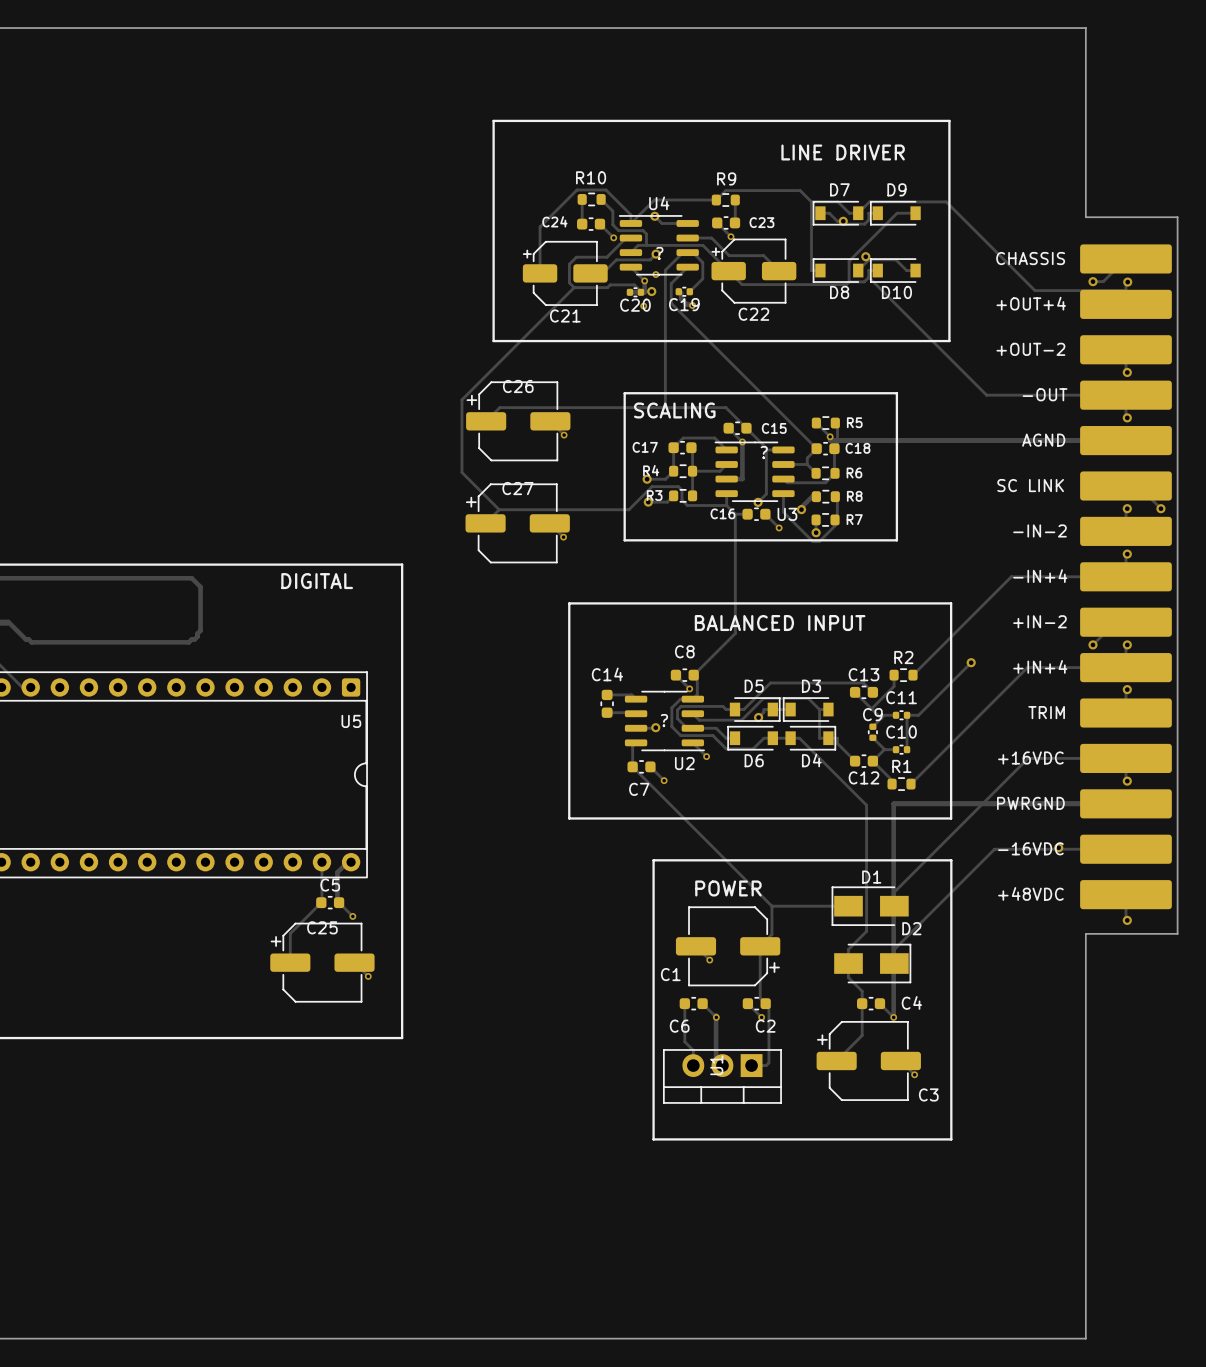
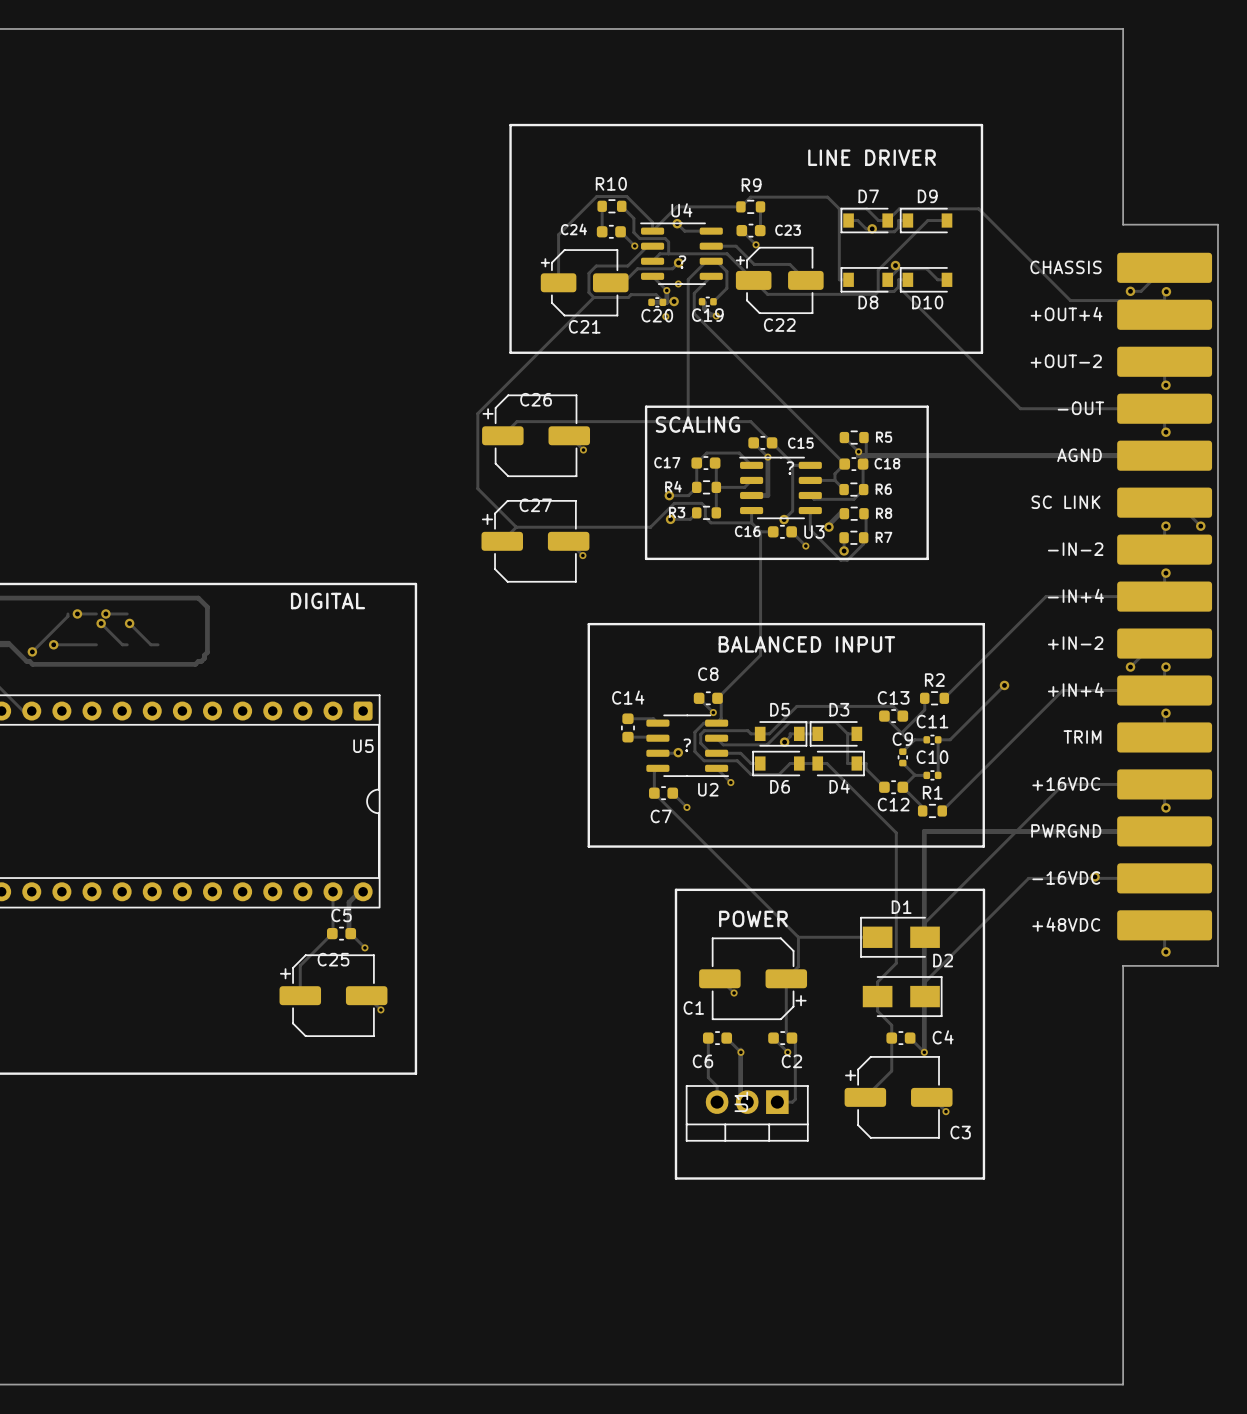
track: none -> (67, 613) (67, 616) (32, 651)
track: none -> (77, 613) (96, 613)
via: none -> (77, 613)
track: none -> (105, 613) (127, 613)
via: none -> (105, 613)
track: none -> (101, 623) (122, 644) (127, 644)
via: none -> (101, 623)
track: none -> (129, 623) (150, 644) (158, 644)
via: none -> (129, 623)
track: none -> (53, 644) (96, 644)
via: none -> (53, 644)
via: none -> (32, 651)

